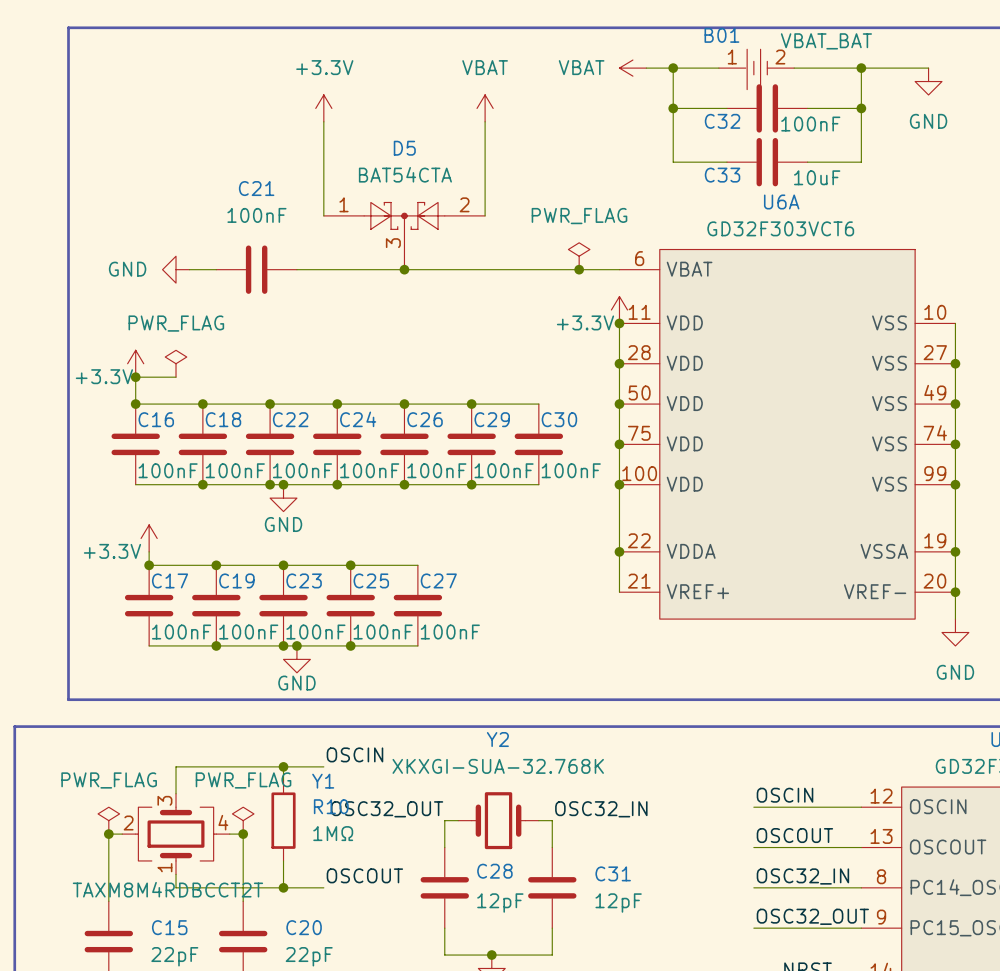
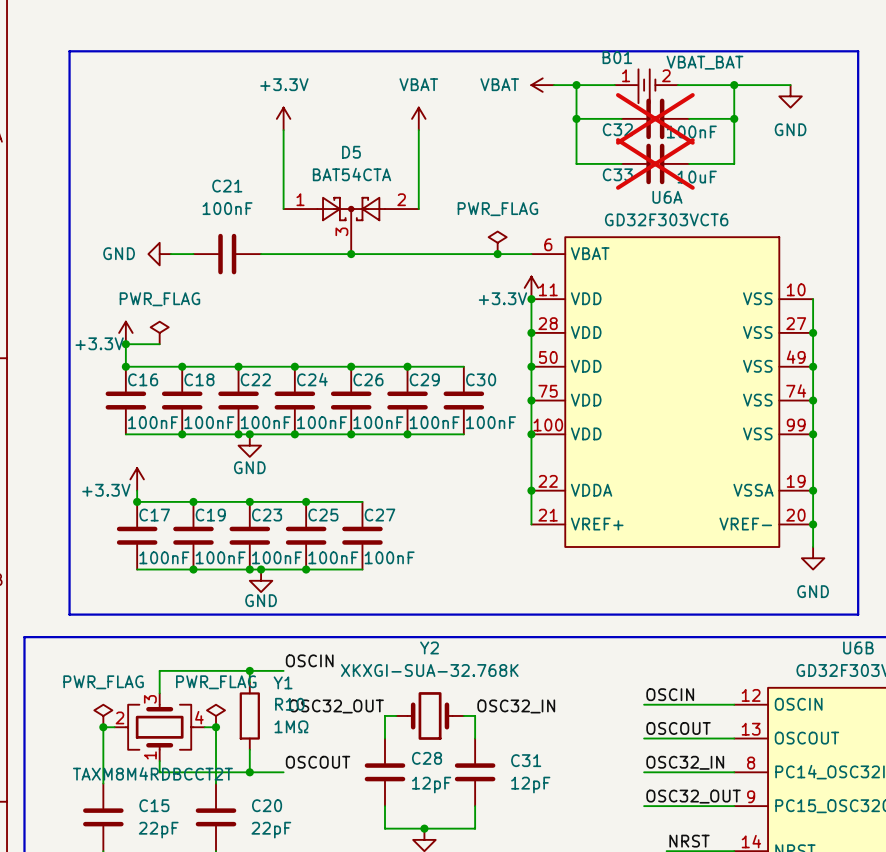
C32 do-not-place cross: none -> (655, 118)
C33 do-not-place cross: none -> (655, 163)

